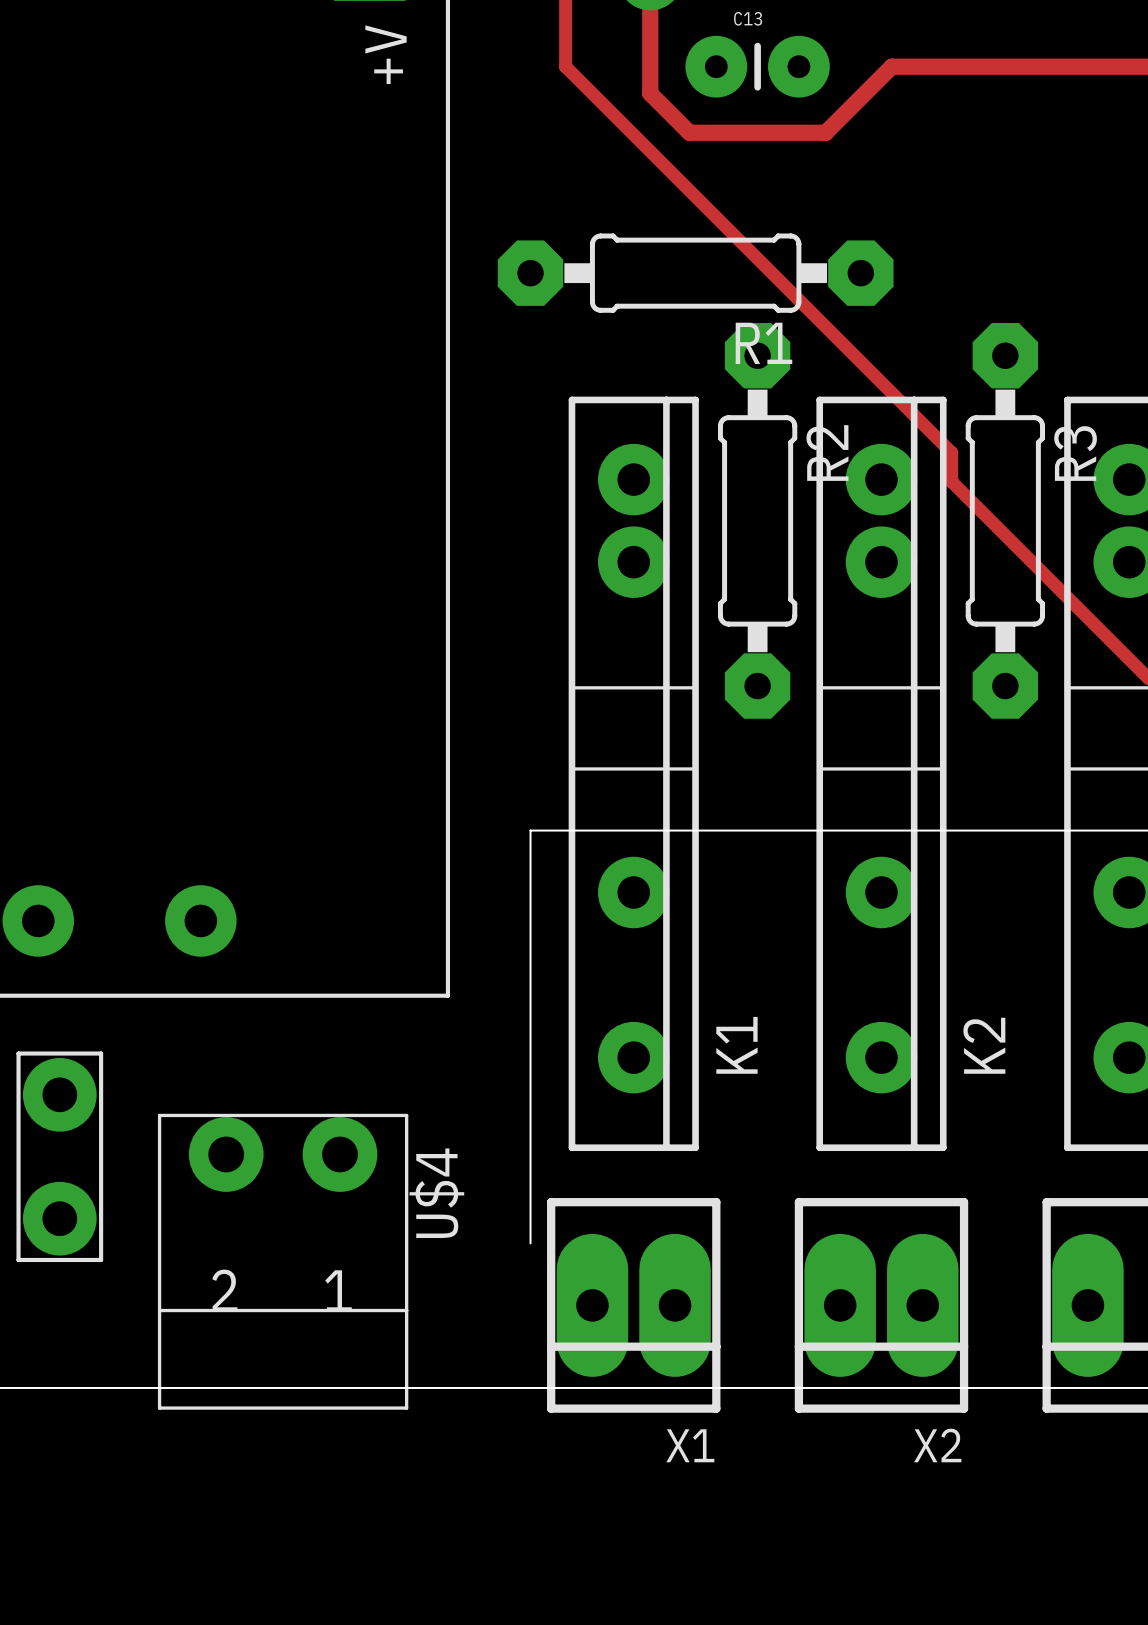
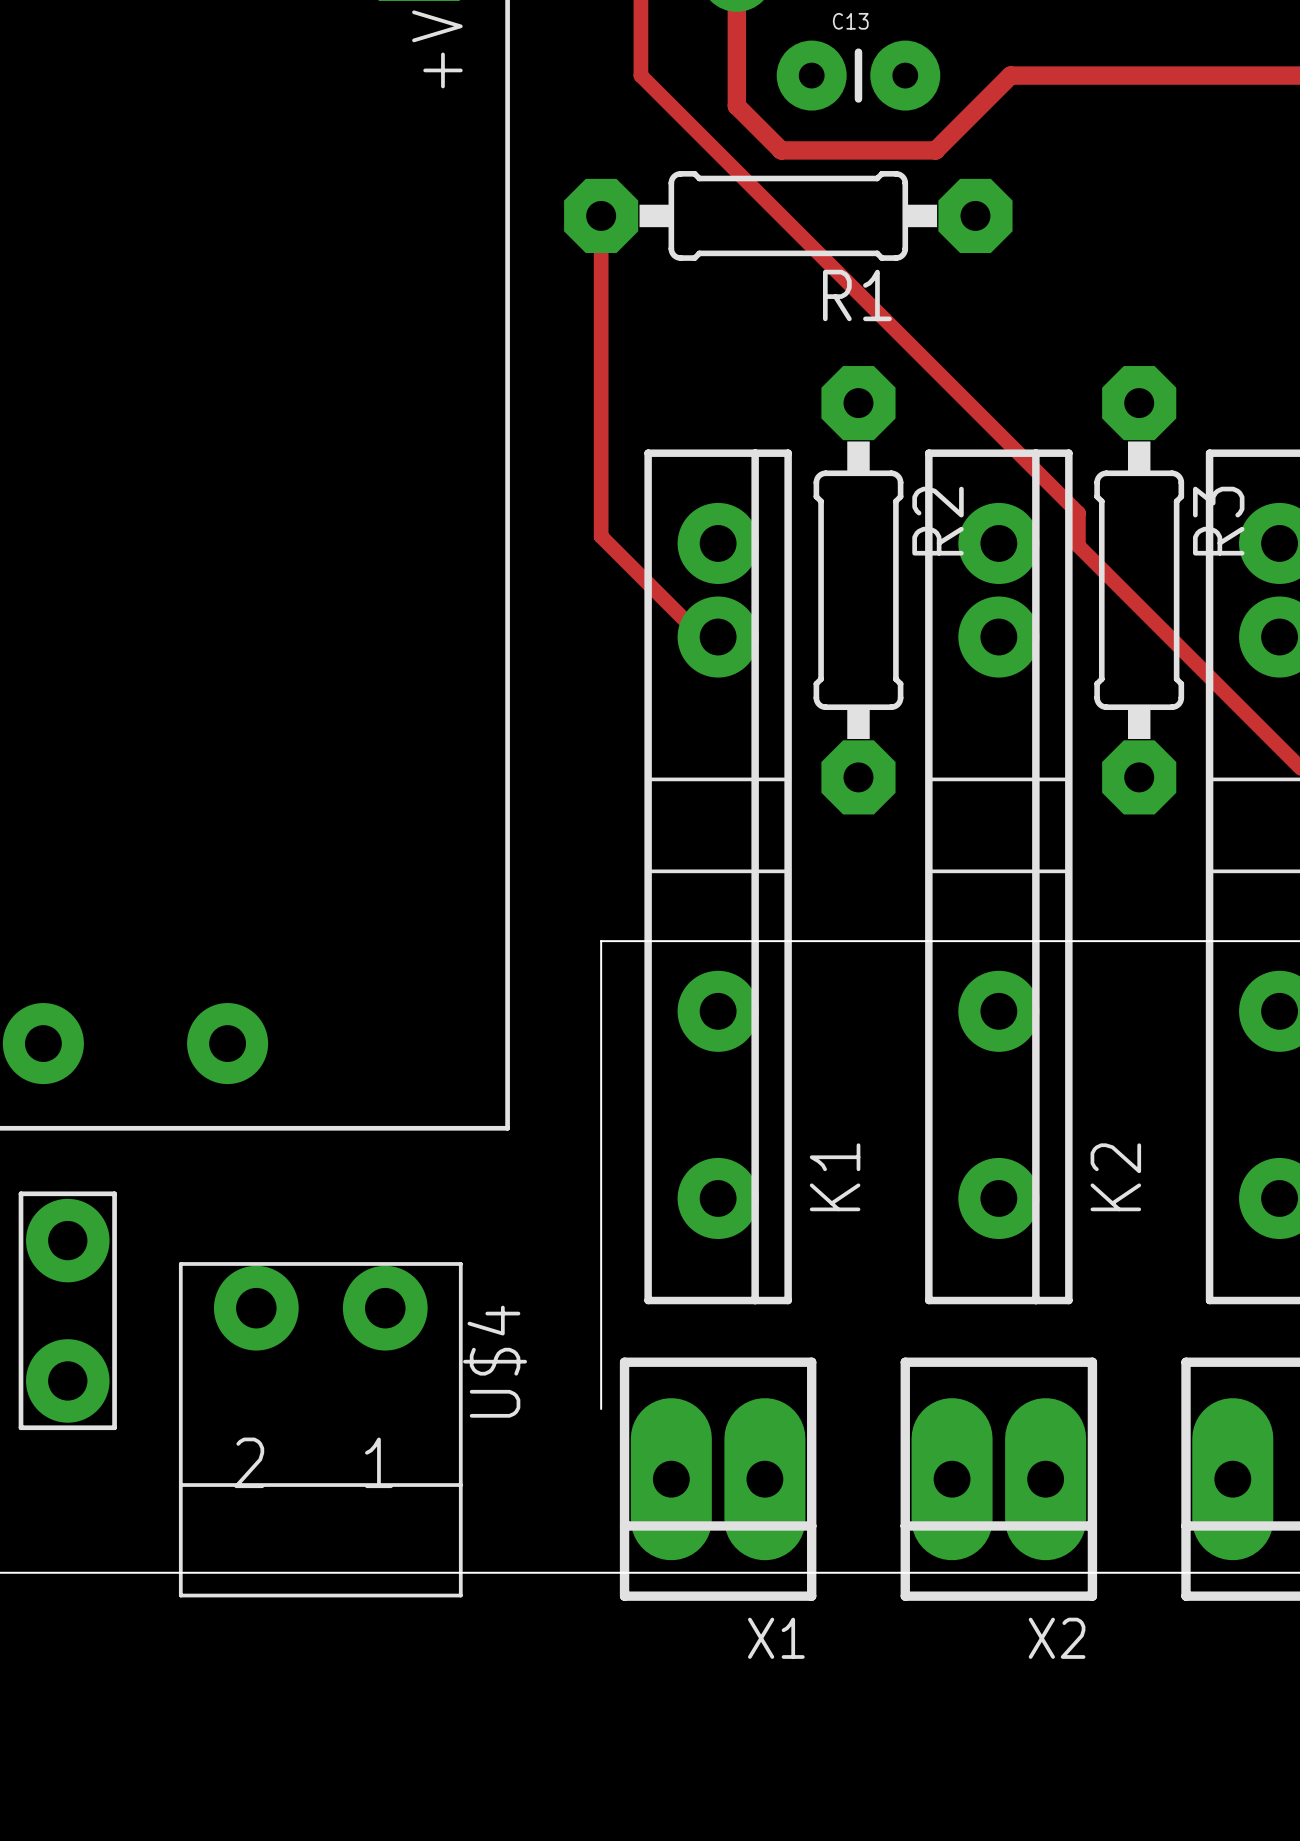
track: none -> (601, 215) (601, 536) (701, 637) (718, 637)
R1 position: (695, 273) -> (788, 215)

